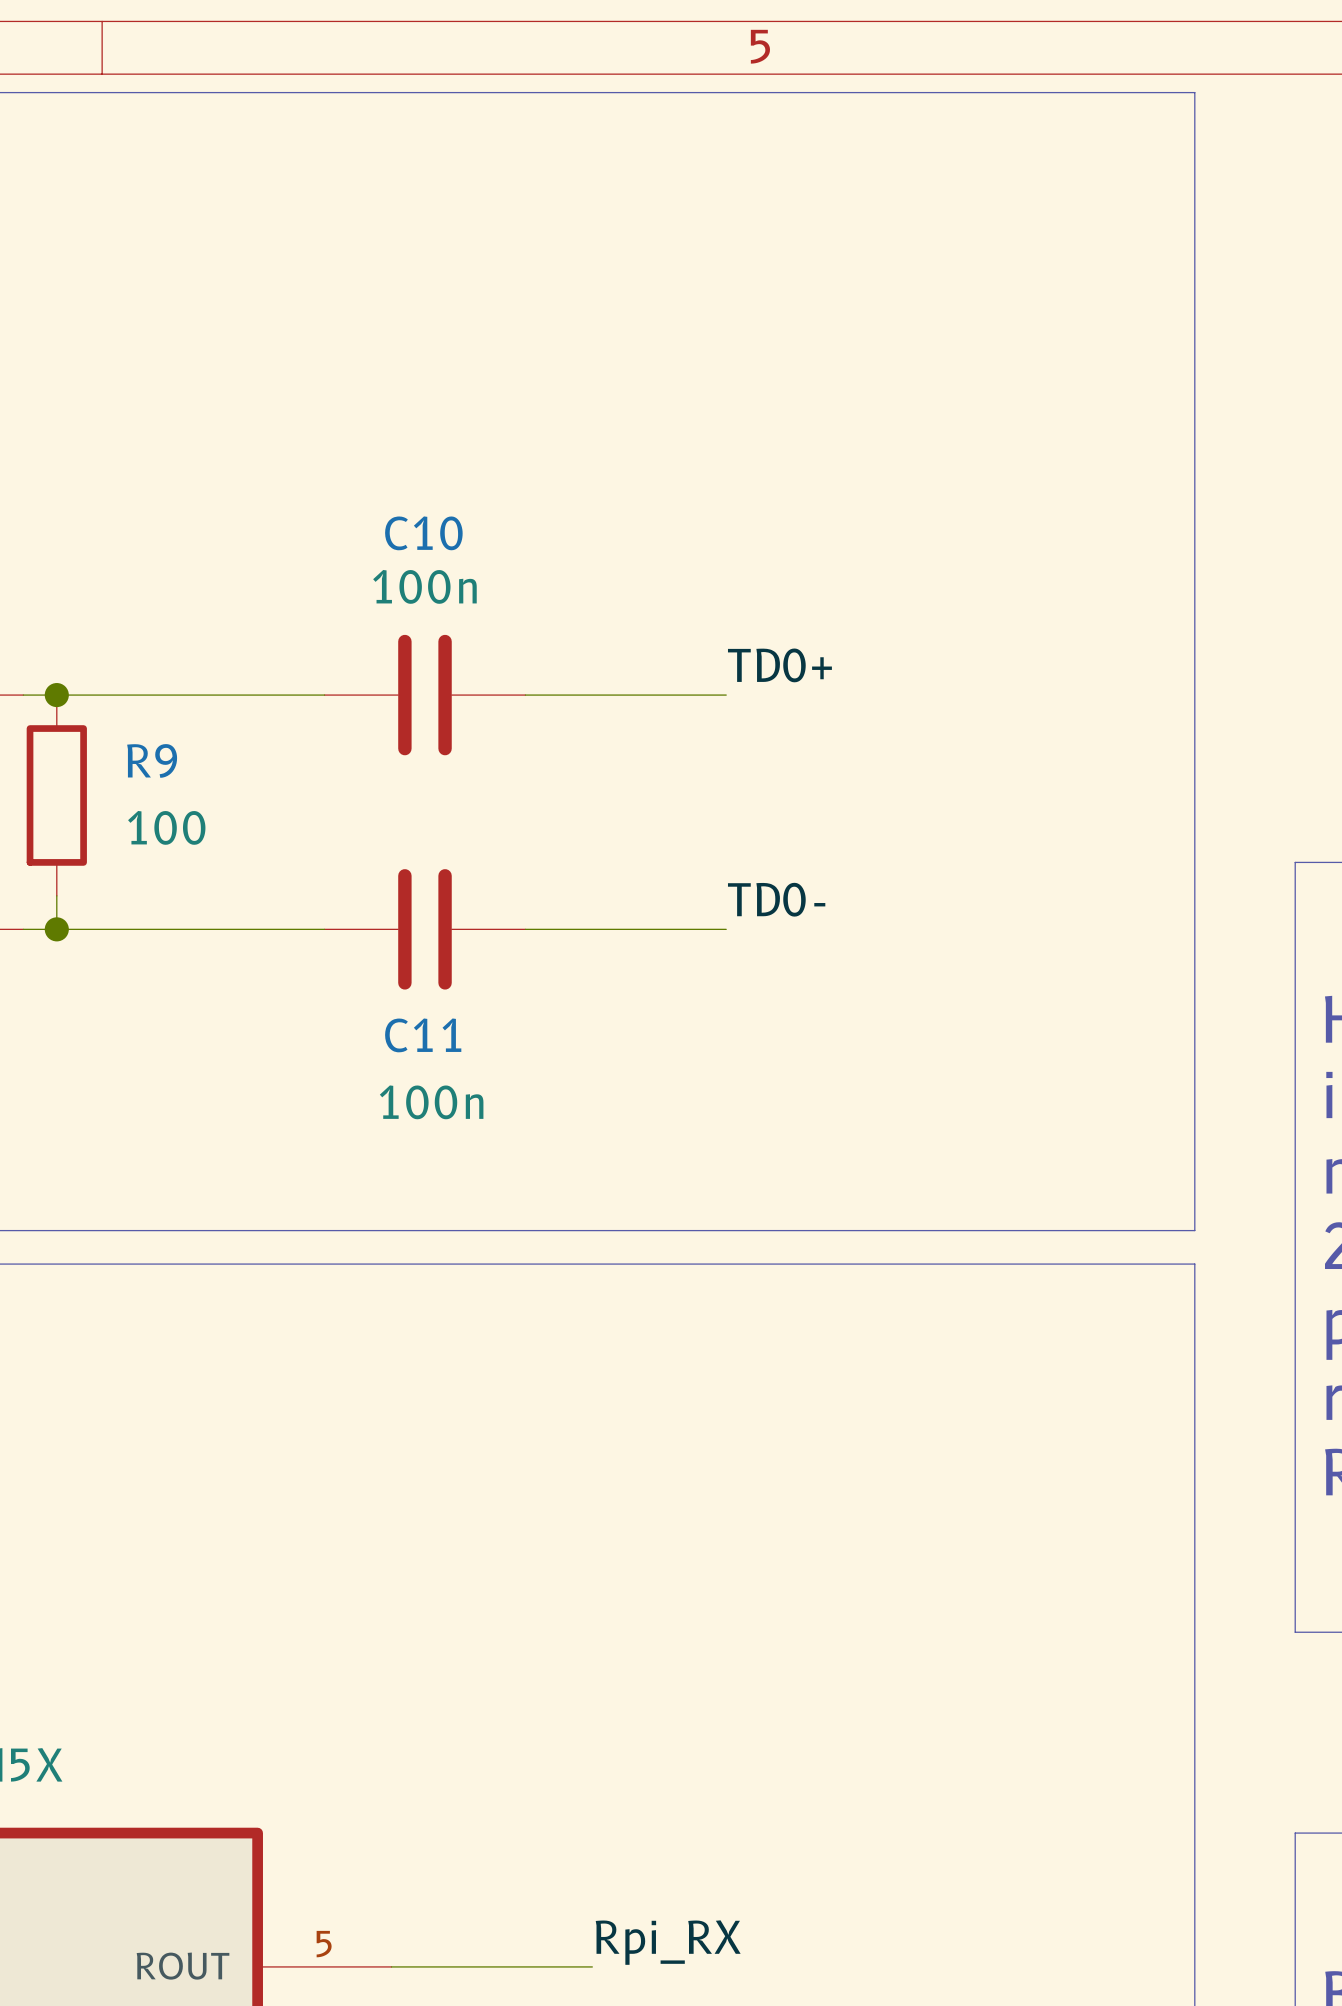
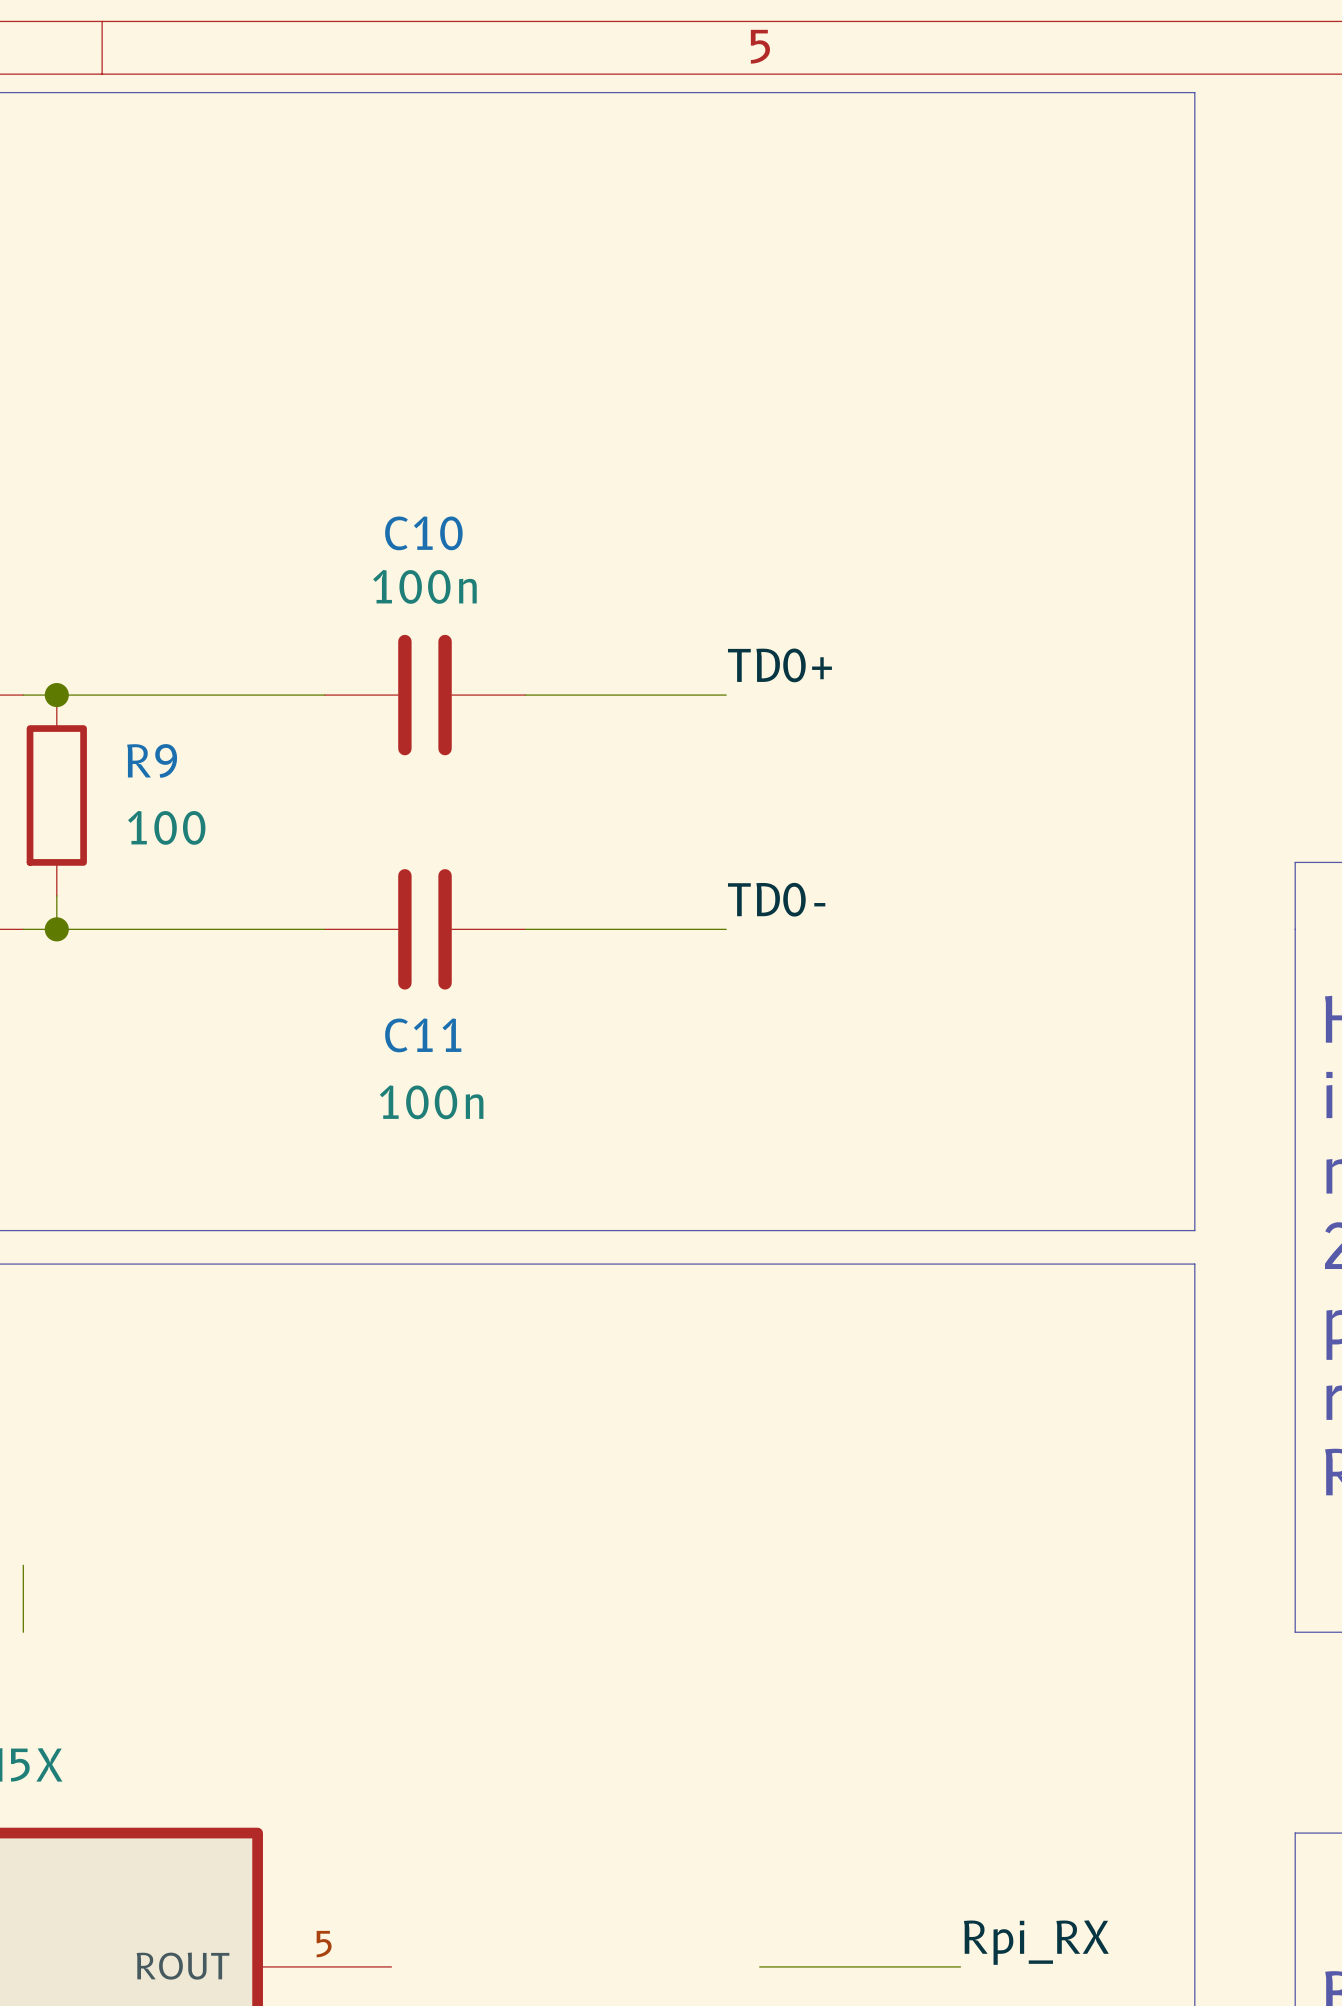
wire: none -> (23, 1565) (23, 1632)
label position: Rpi_RX (668, 1942) -> Rpi_RX (1036, 1942)
wire: (391, 1966) (592, 1966) -> (759, 1966) (960, 1966)

